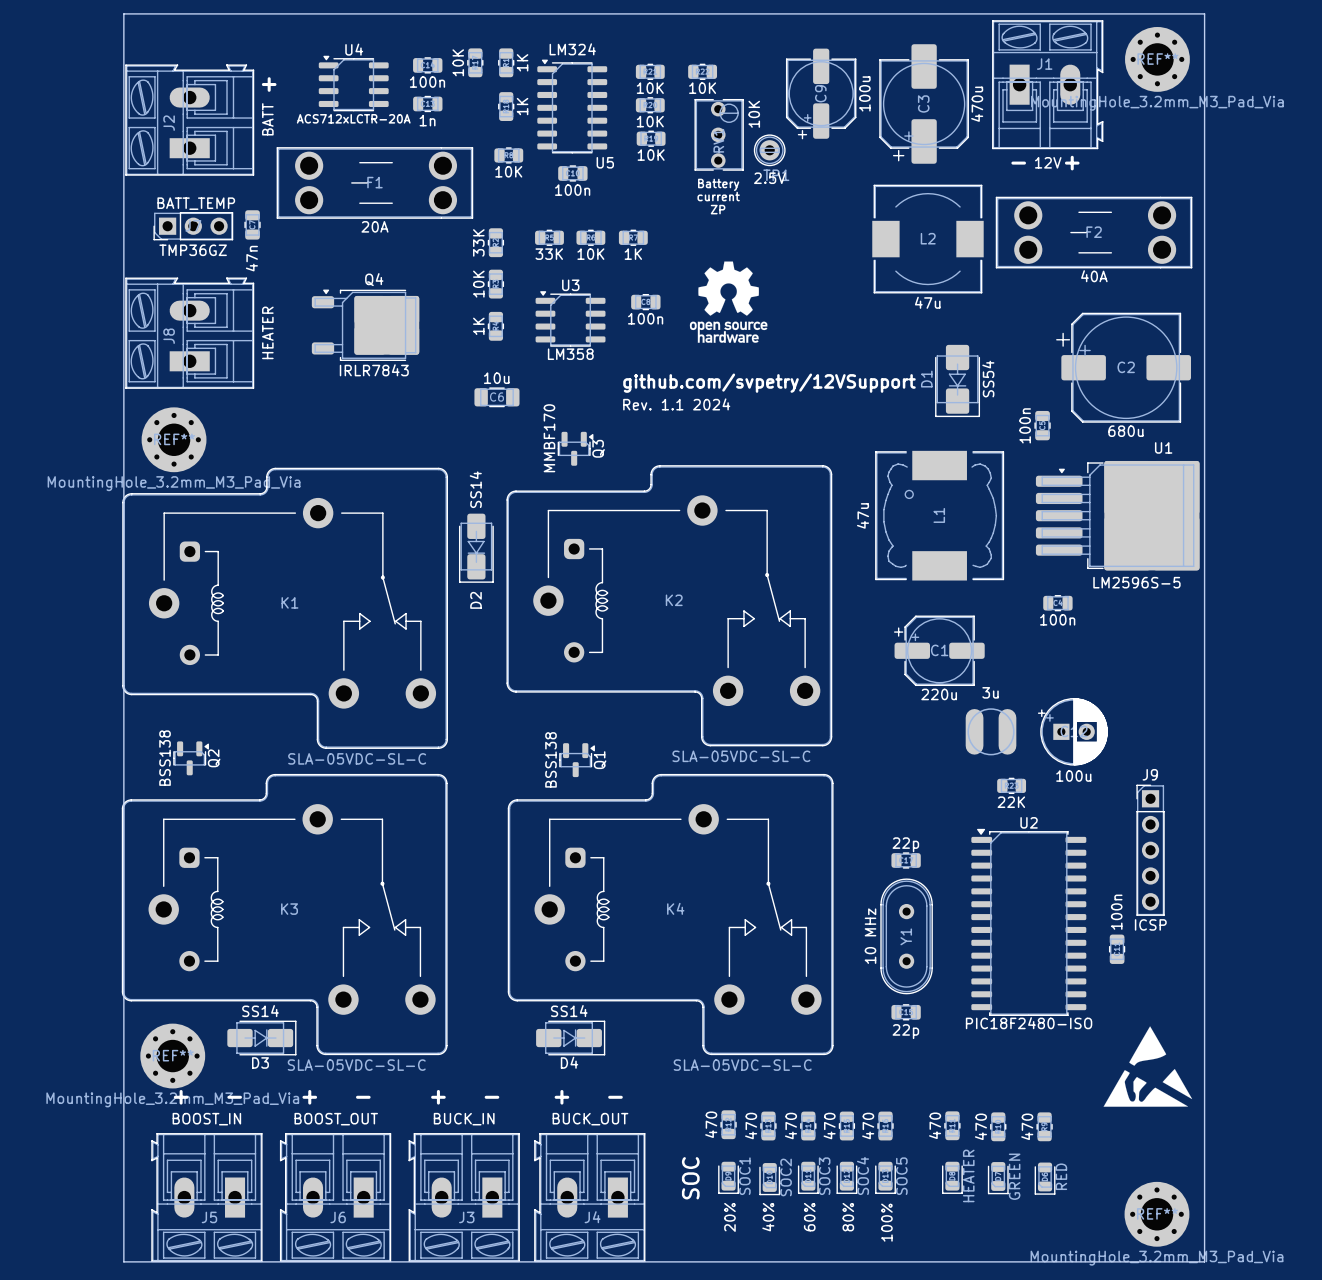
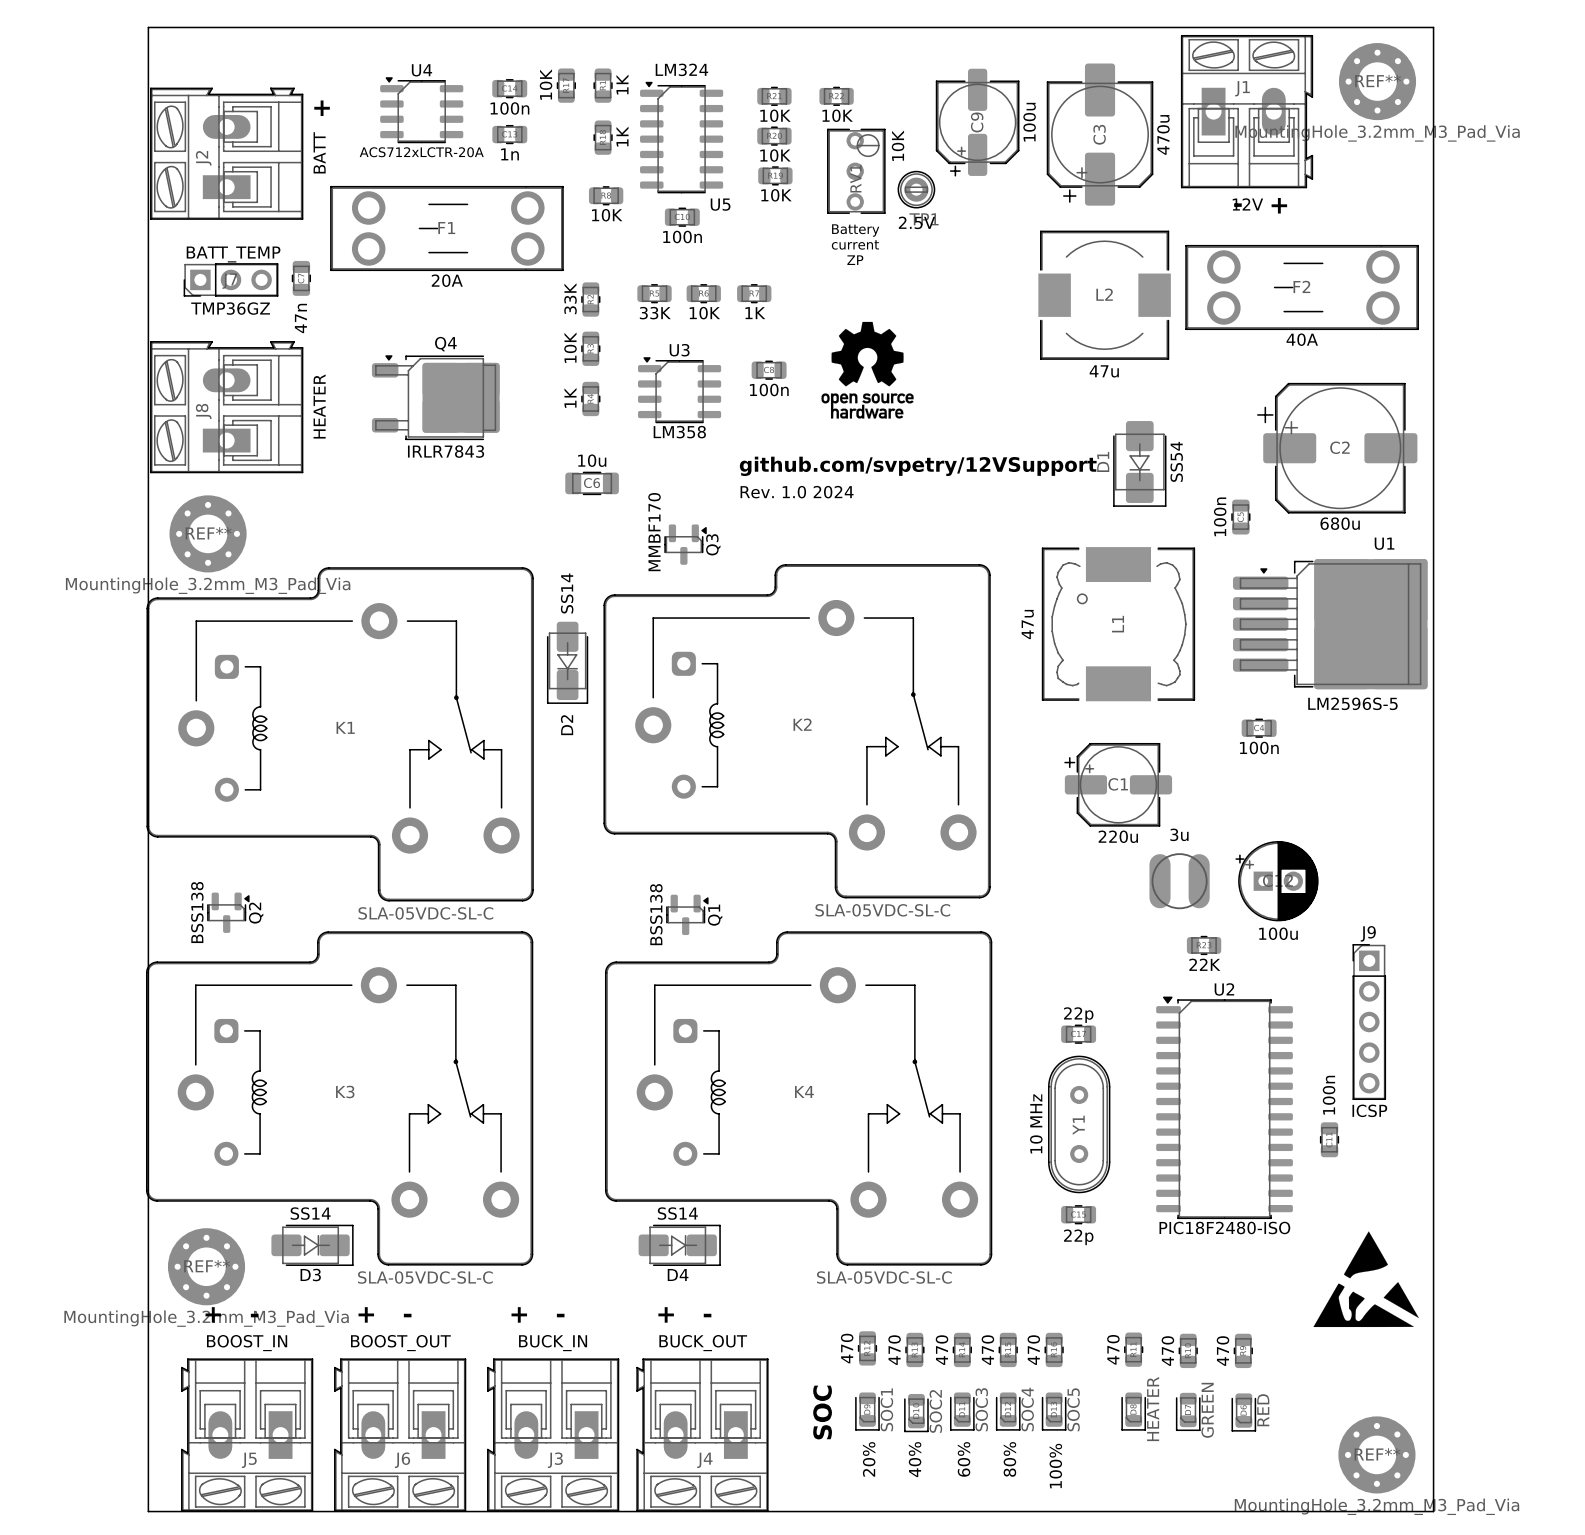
text: Rev. 1.1 2024 (676, 404) -> Rev. 1.0 2024 (797, 492)

